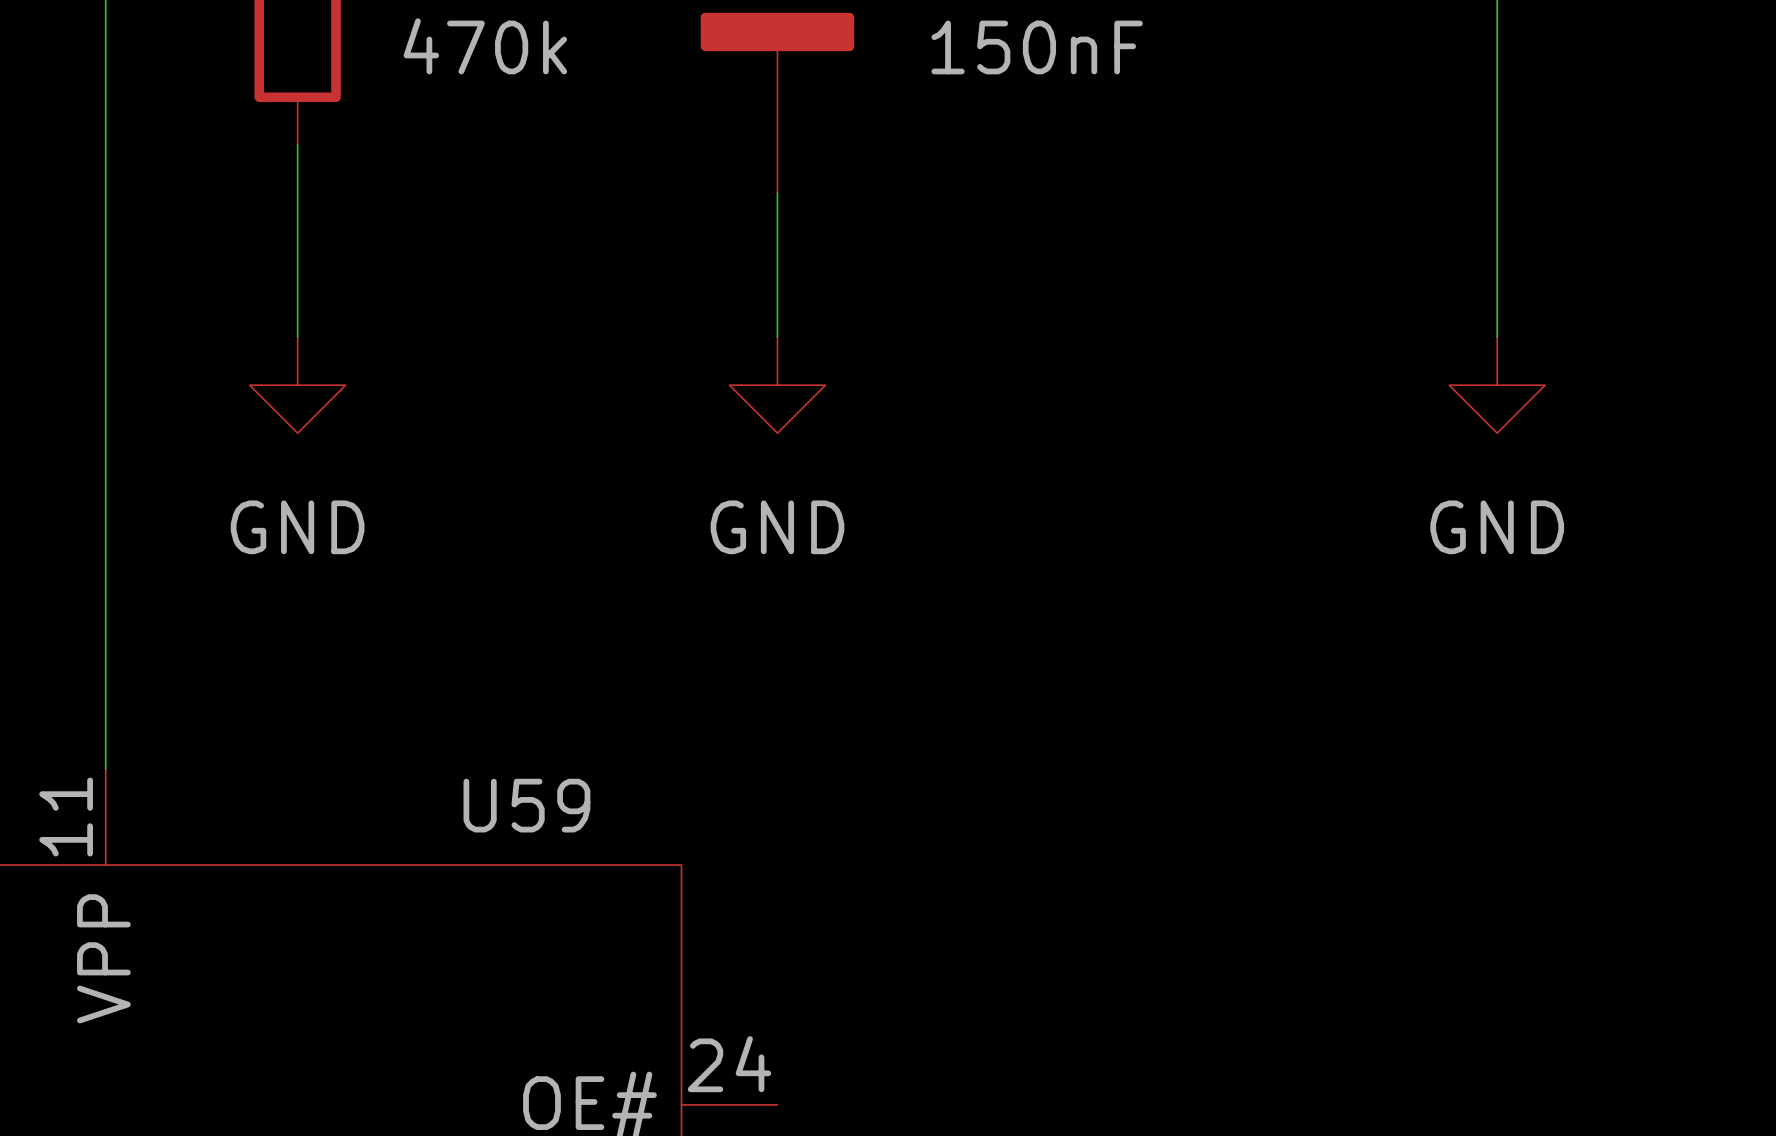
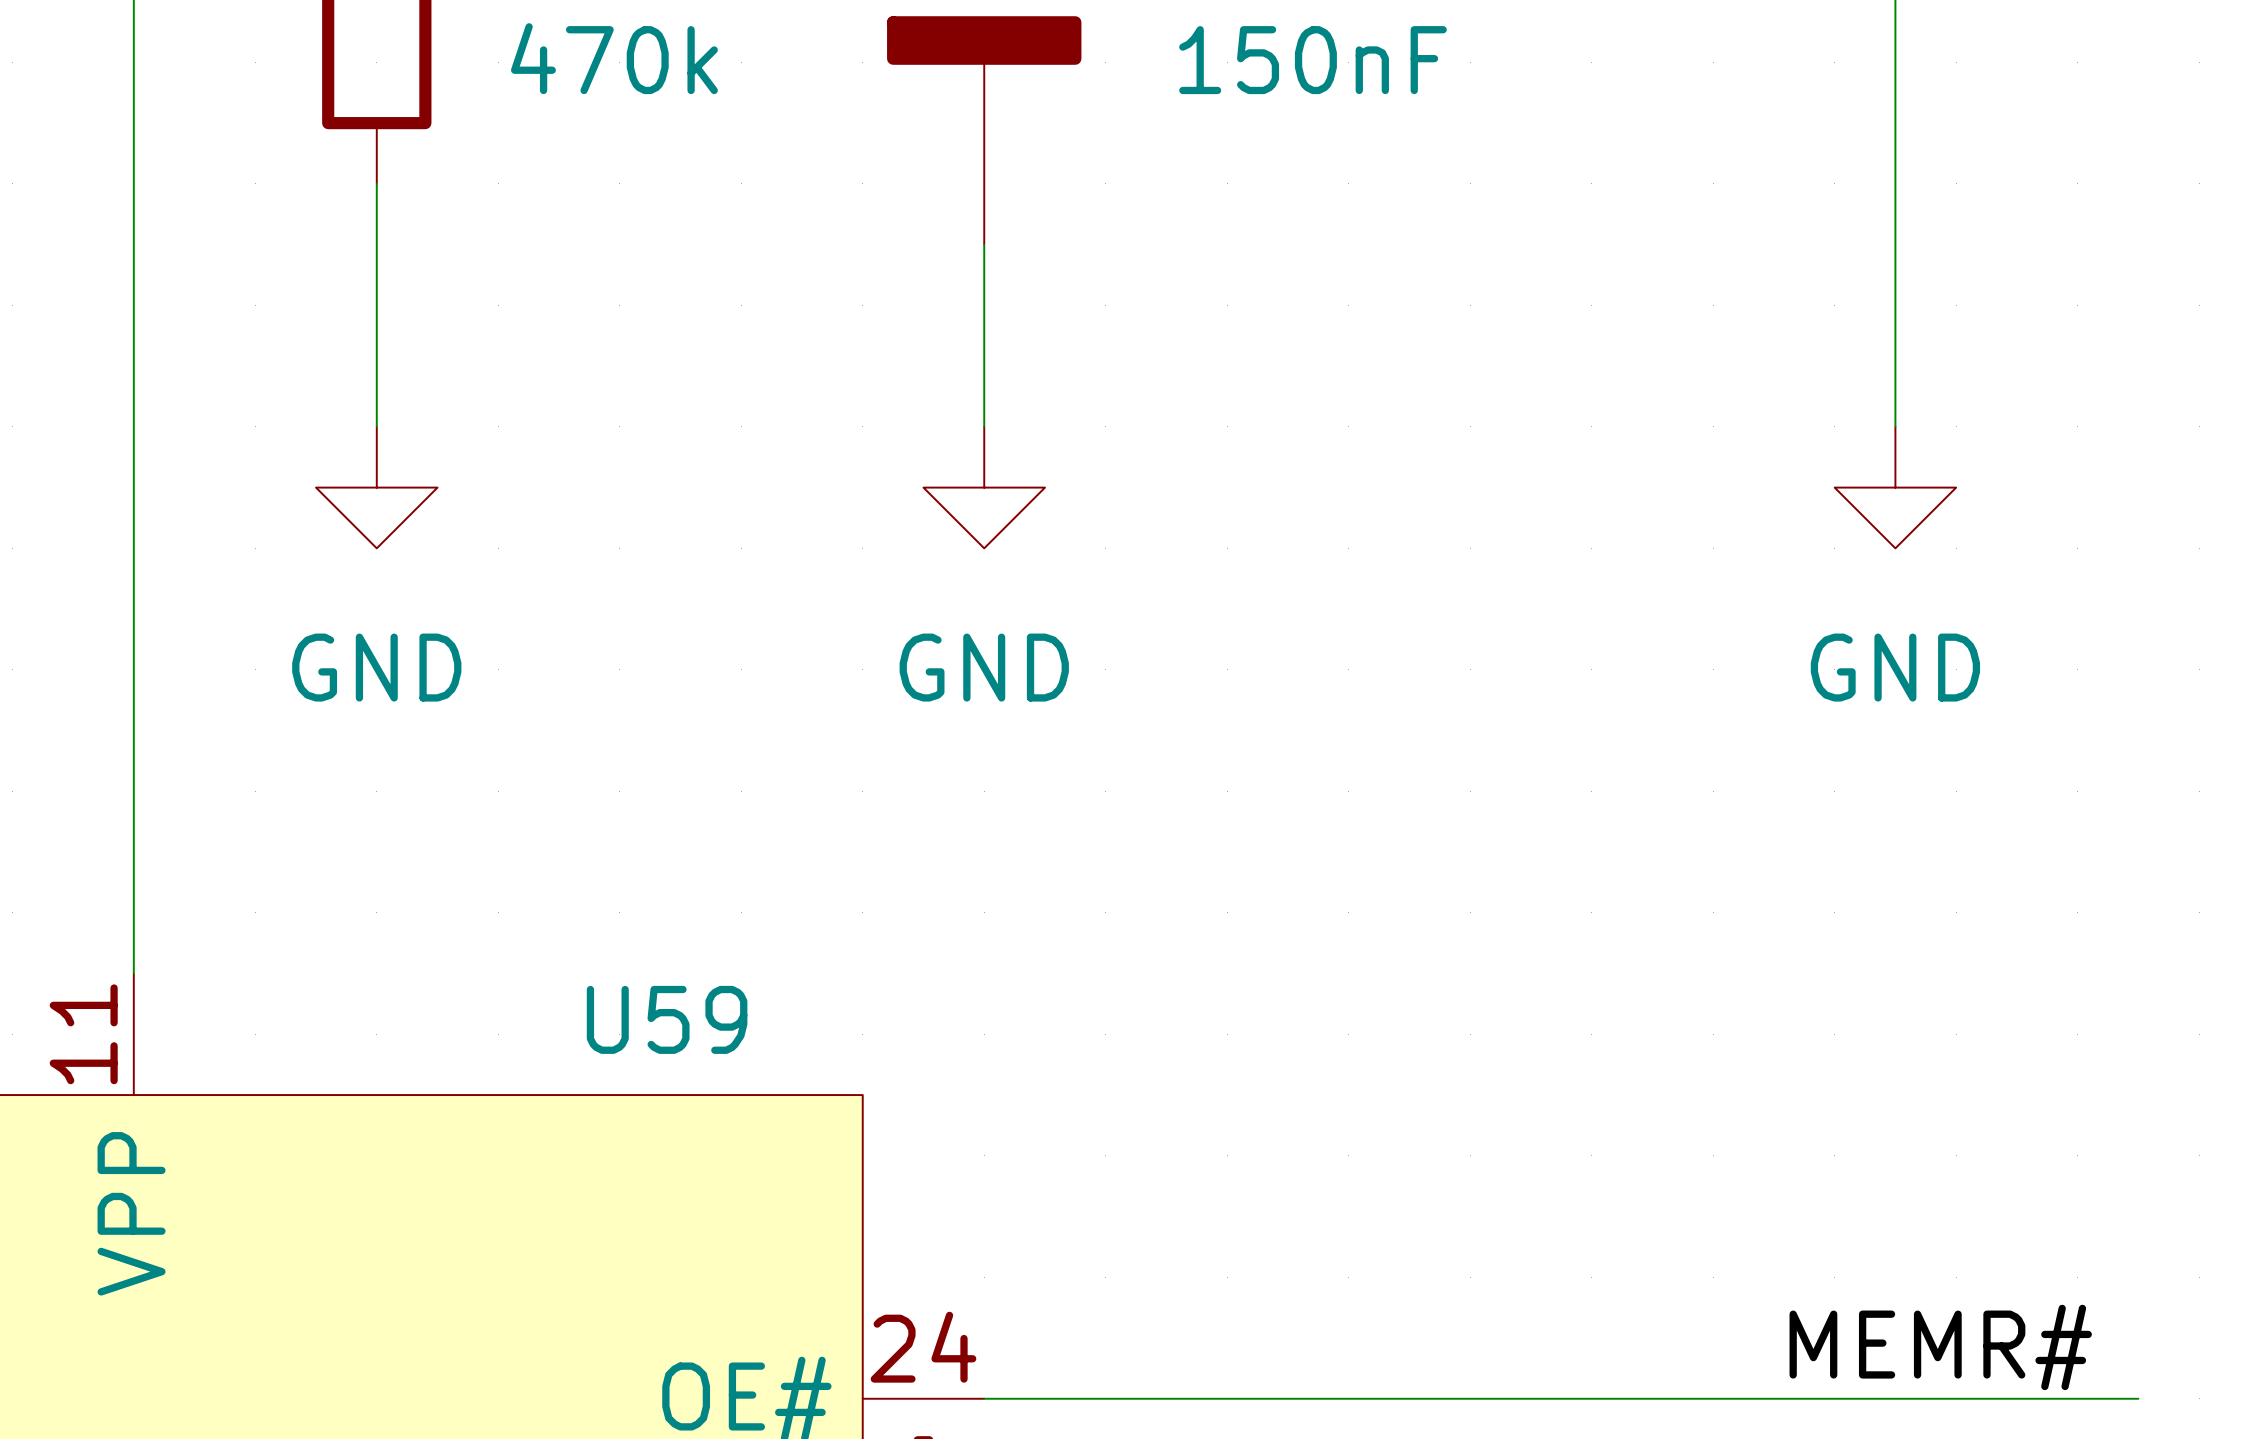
label: none -> MEMR# (1940, 1347)
wire: none -> (984, 1398) (2138, 1398)

